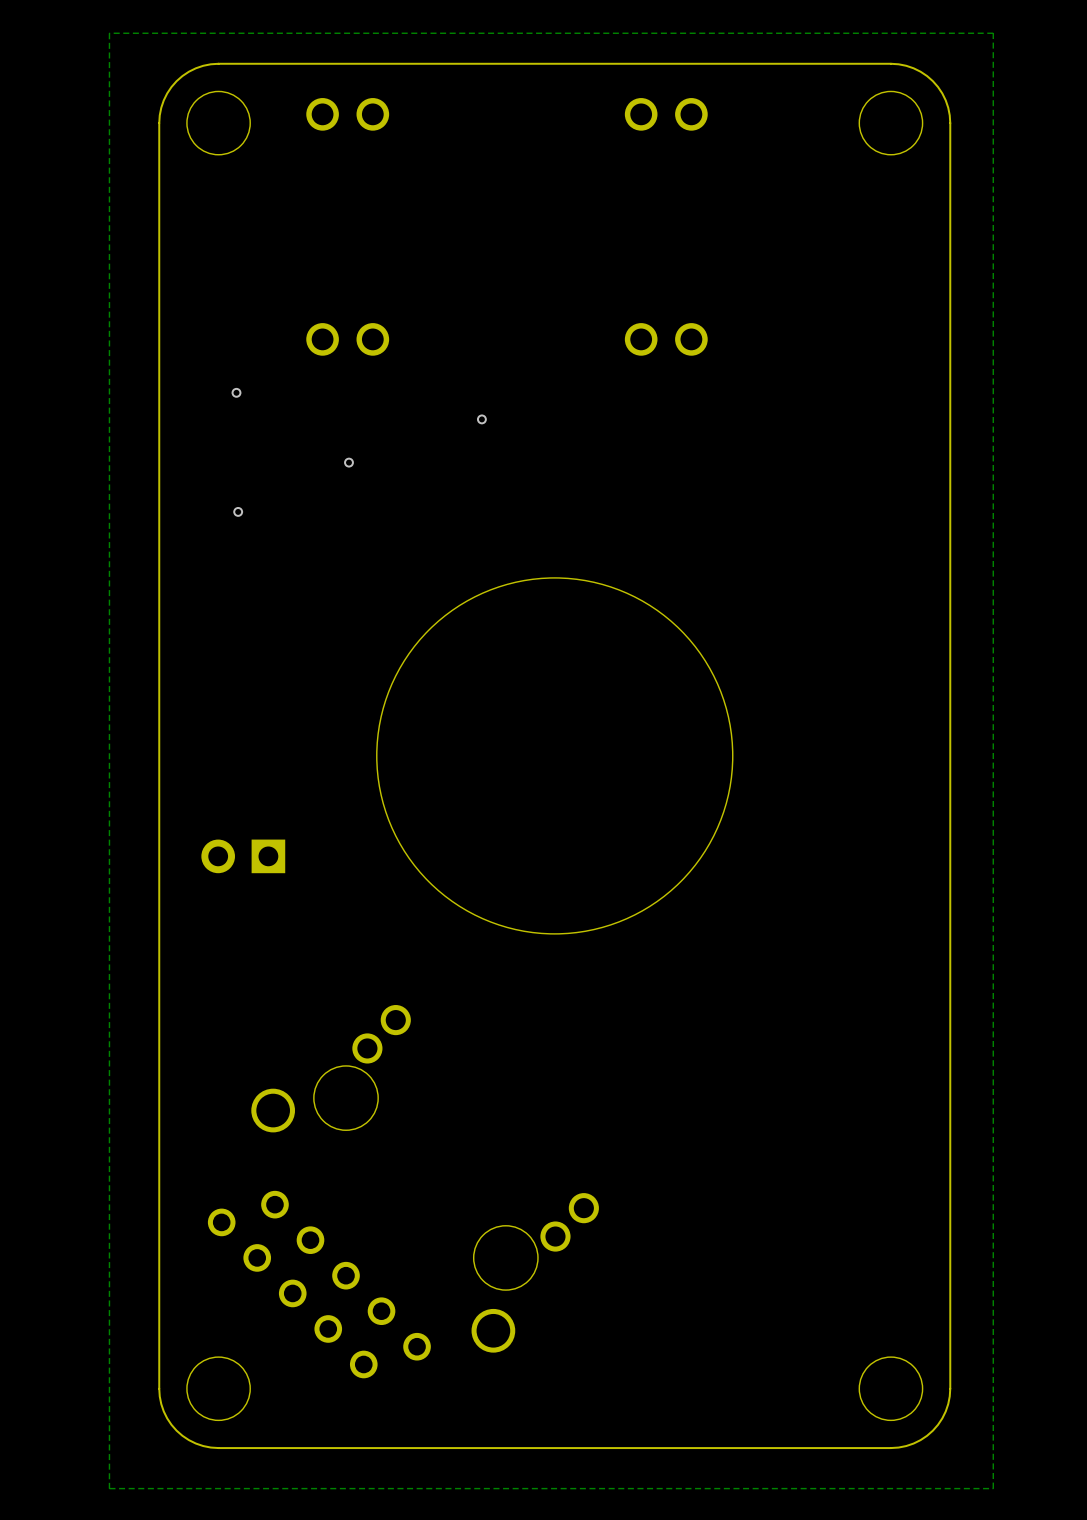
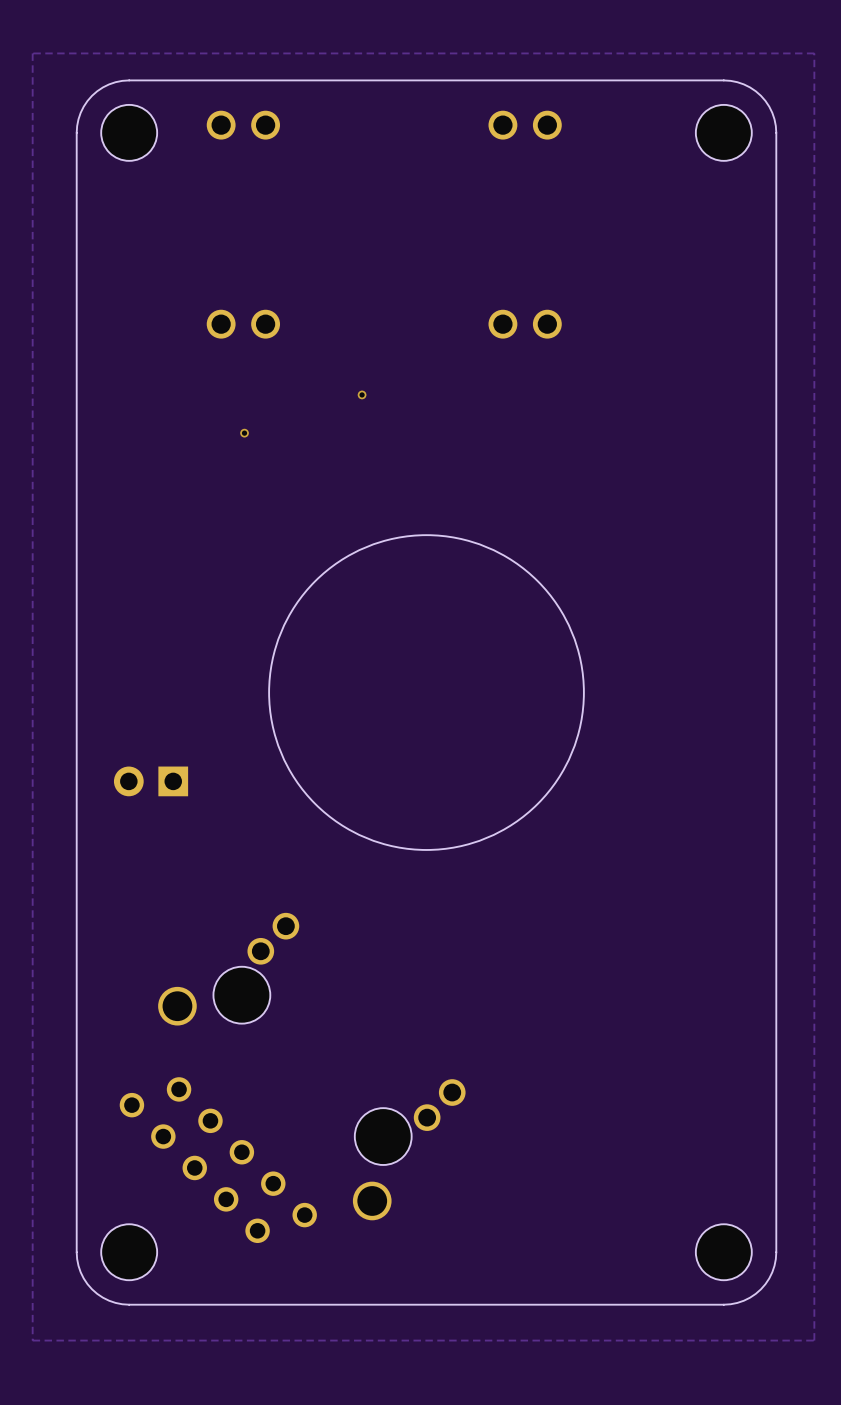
via: (236, 392) -> none
via: (238, 511) -> none

